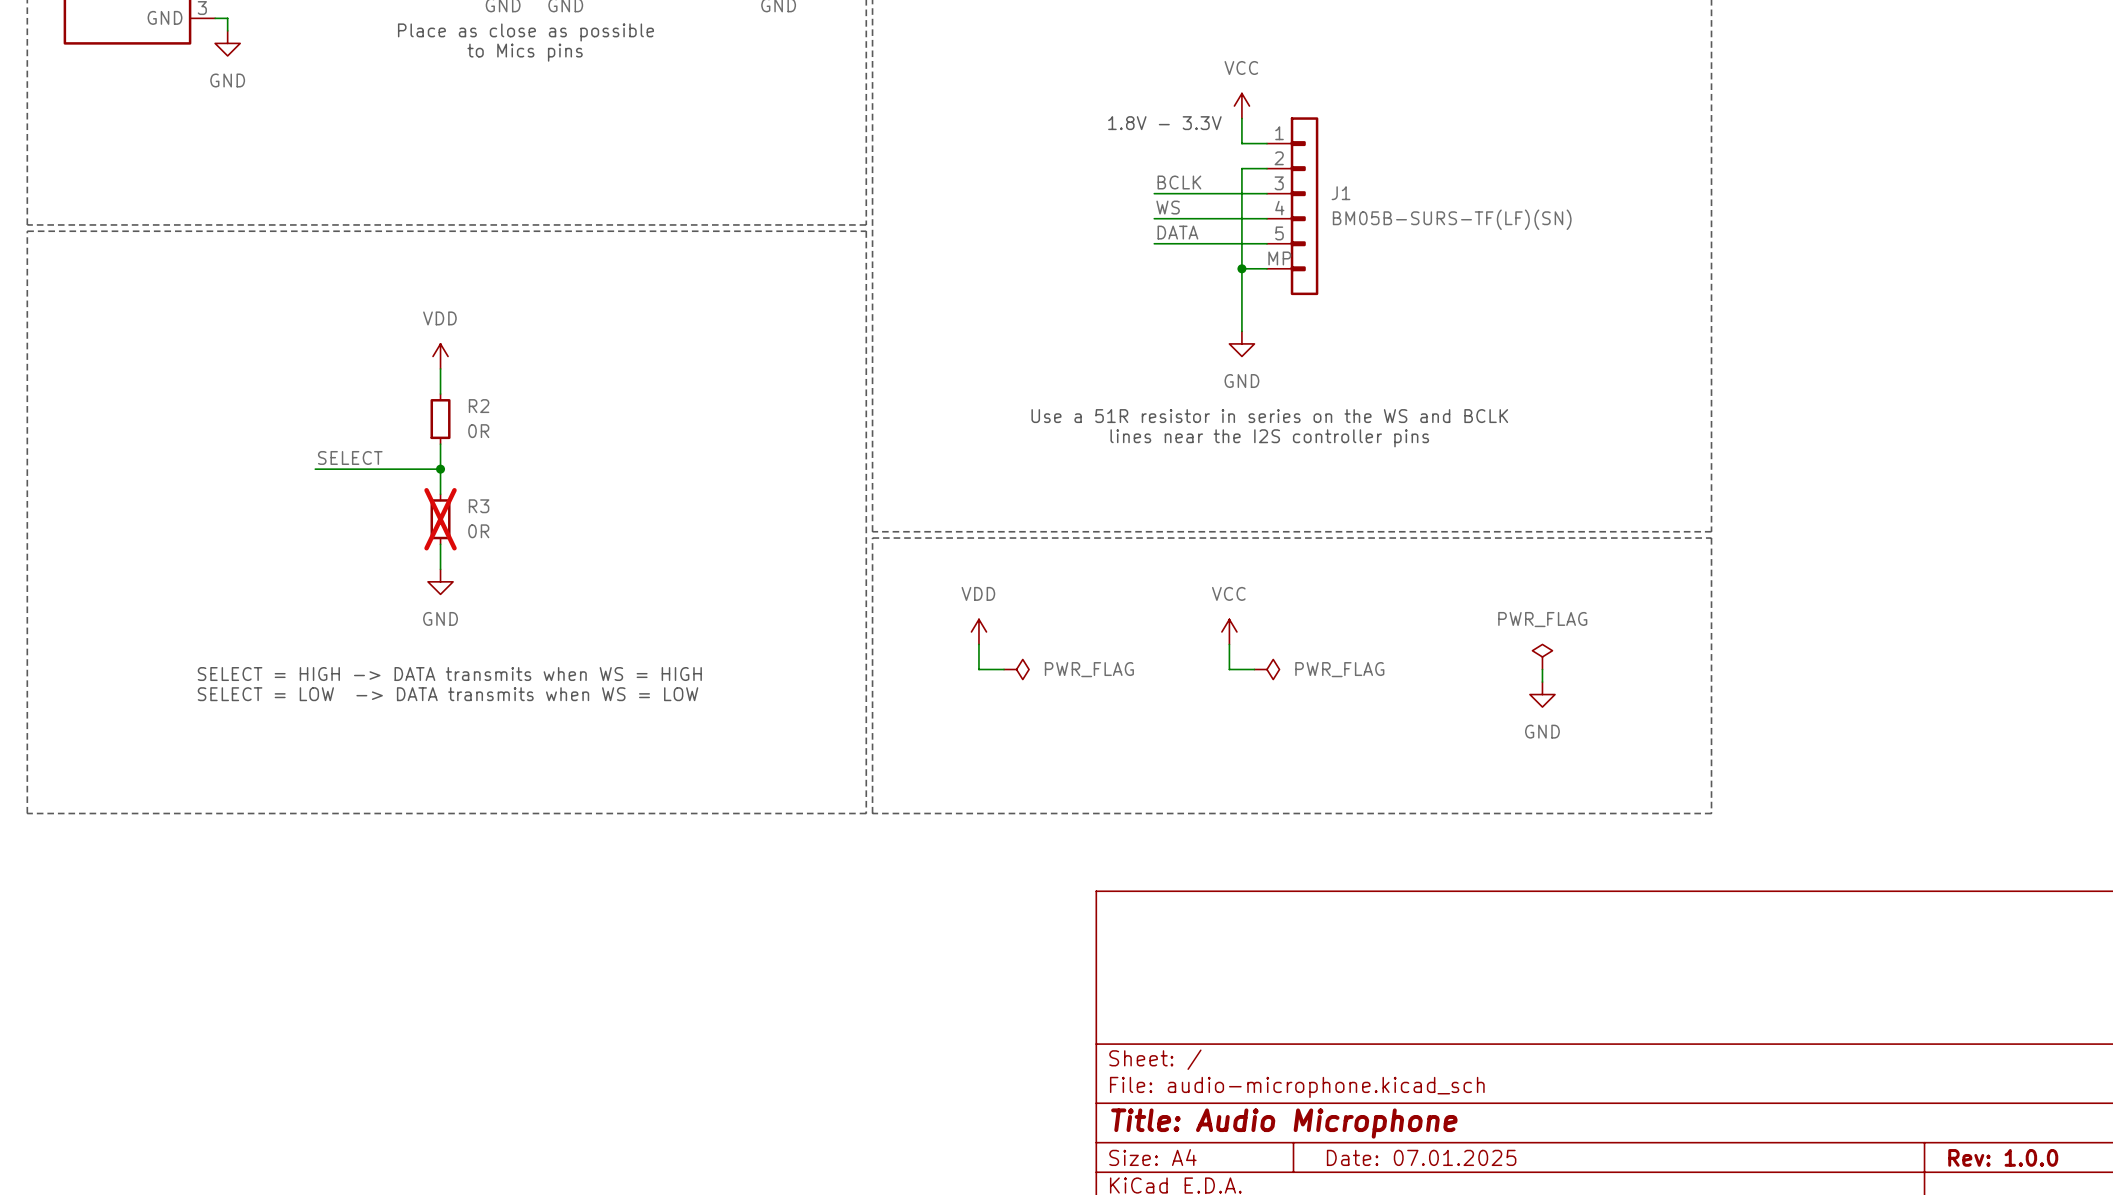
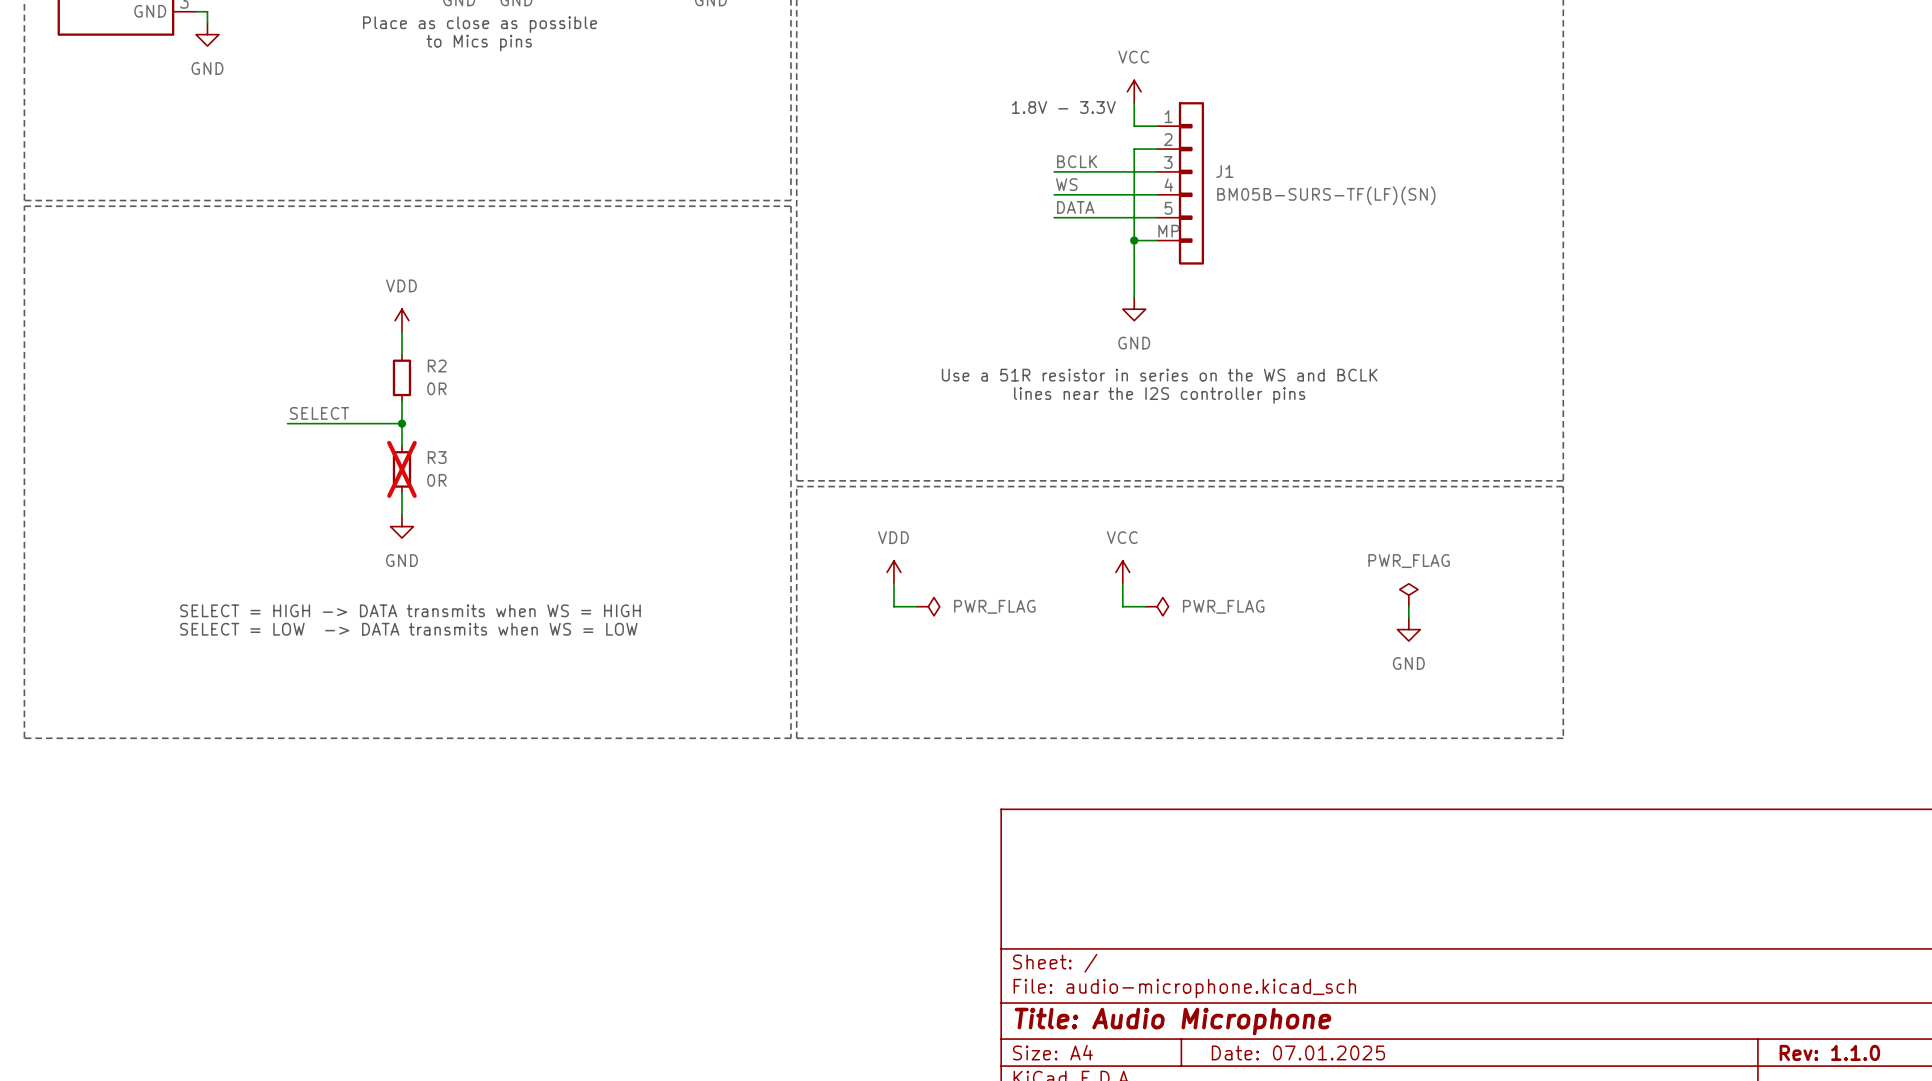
title block: Rev: 1.0.0 (2003, 1157) -> Rev: 1.1.0 (1829, 1052)

